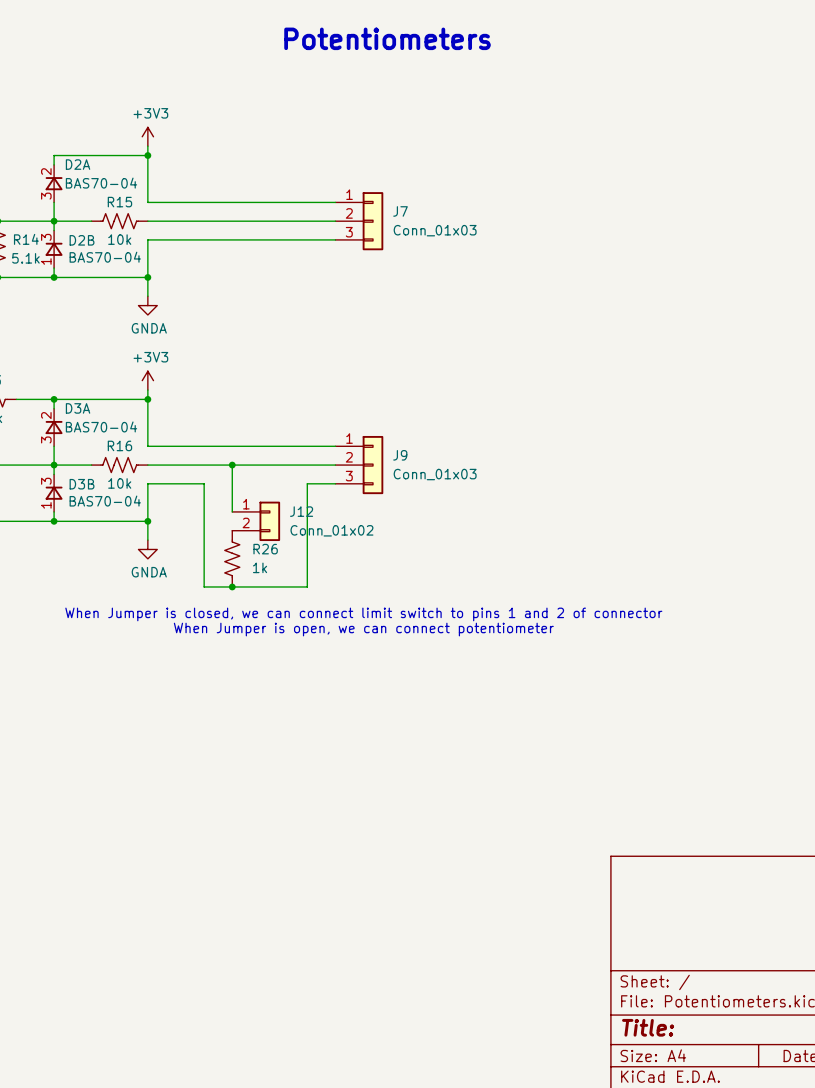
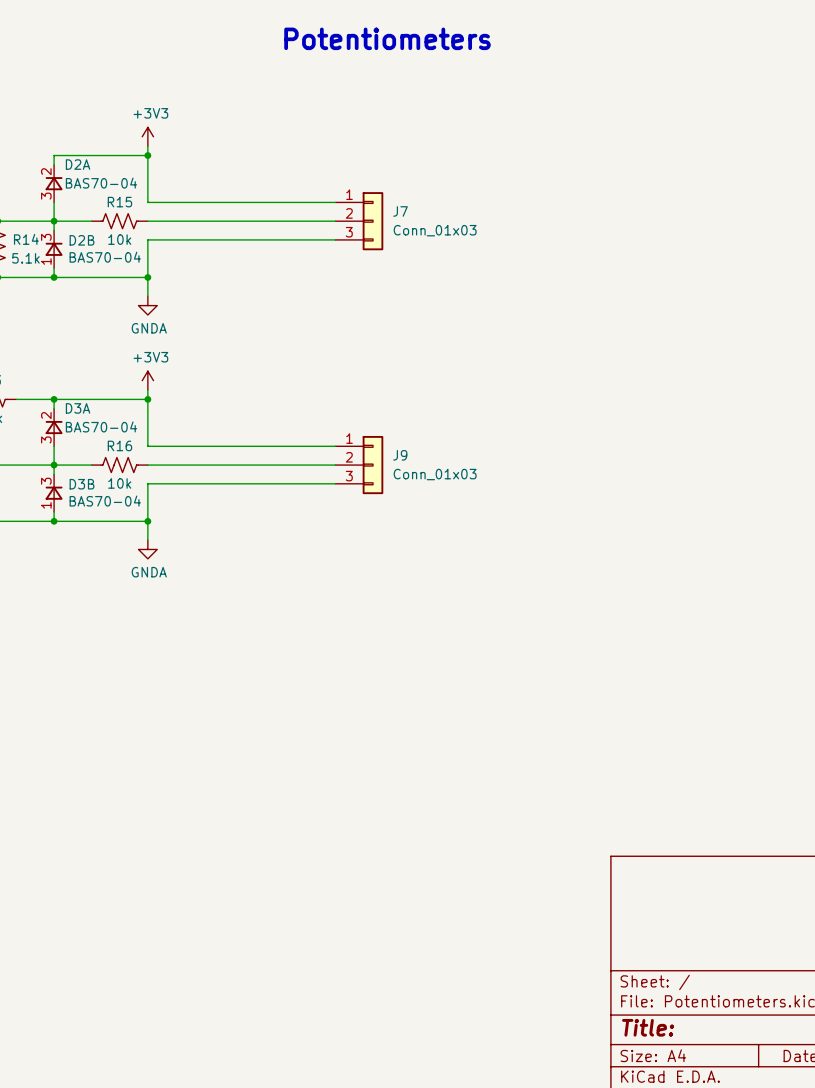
wire: (232, 465) (232, 511) -> none
junction: (232, 465) -> none
wire: (204, 483) (204, 586) (307, 586) (307, 483) -> (204, 483) (307, 483)
J12: Conn_01x02 (256, 521) -> none
R26: 1k (232, 558) -> none
junction: (232, 586) -> none
text: When Jumper is closed, we can connect limit switch to pins 1 and 2 of connector (363, 614) -> none
text: When Jumper is open, we can connect potentiometer (363, 629) -> none

